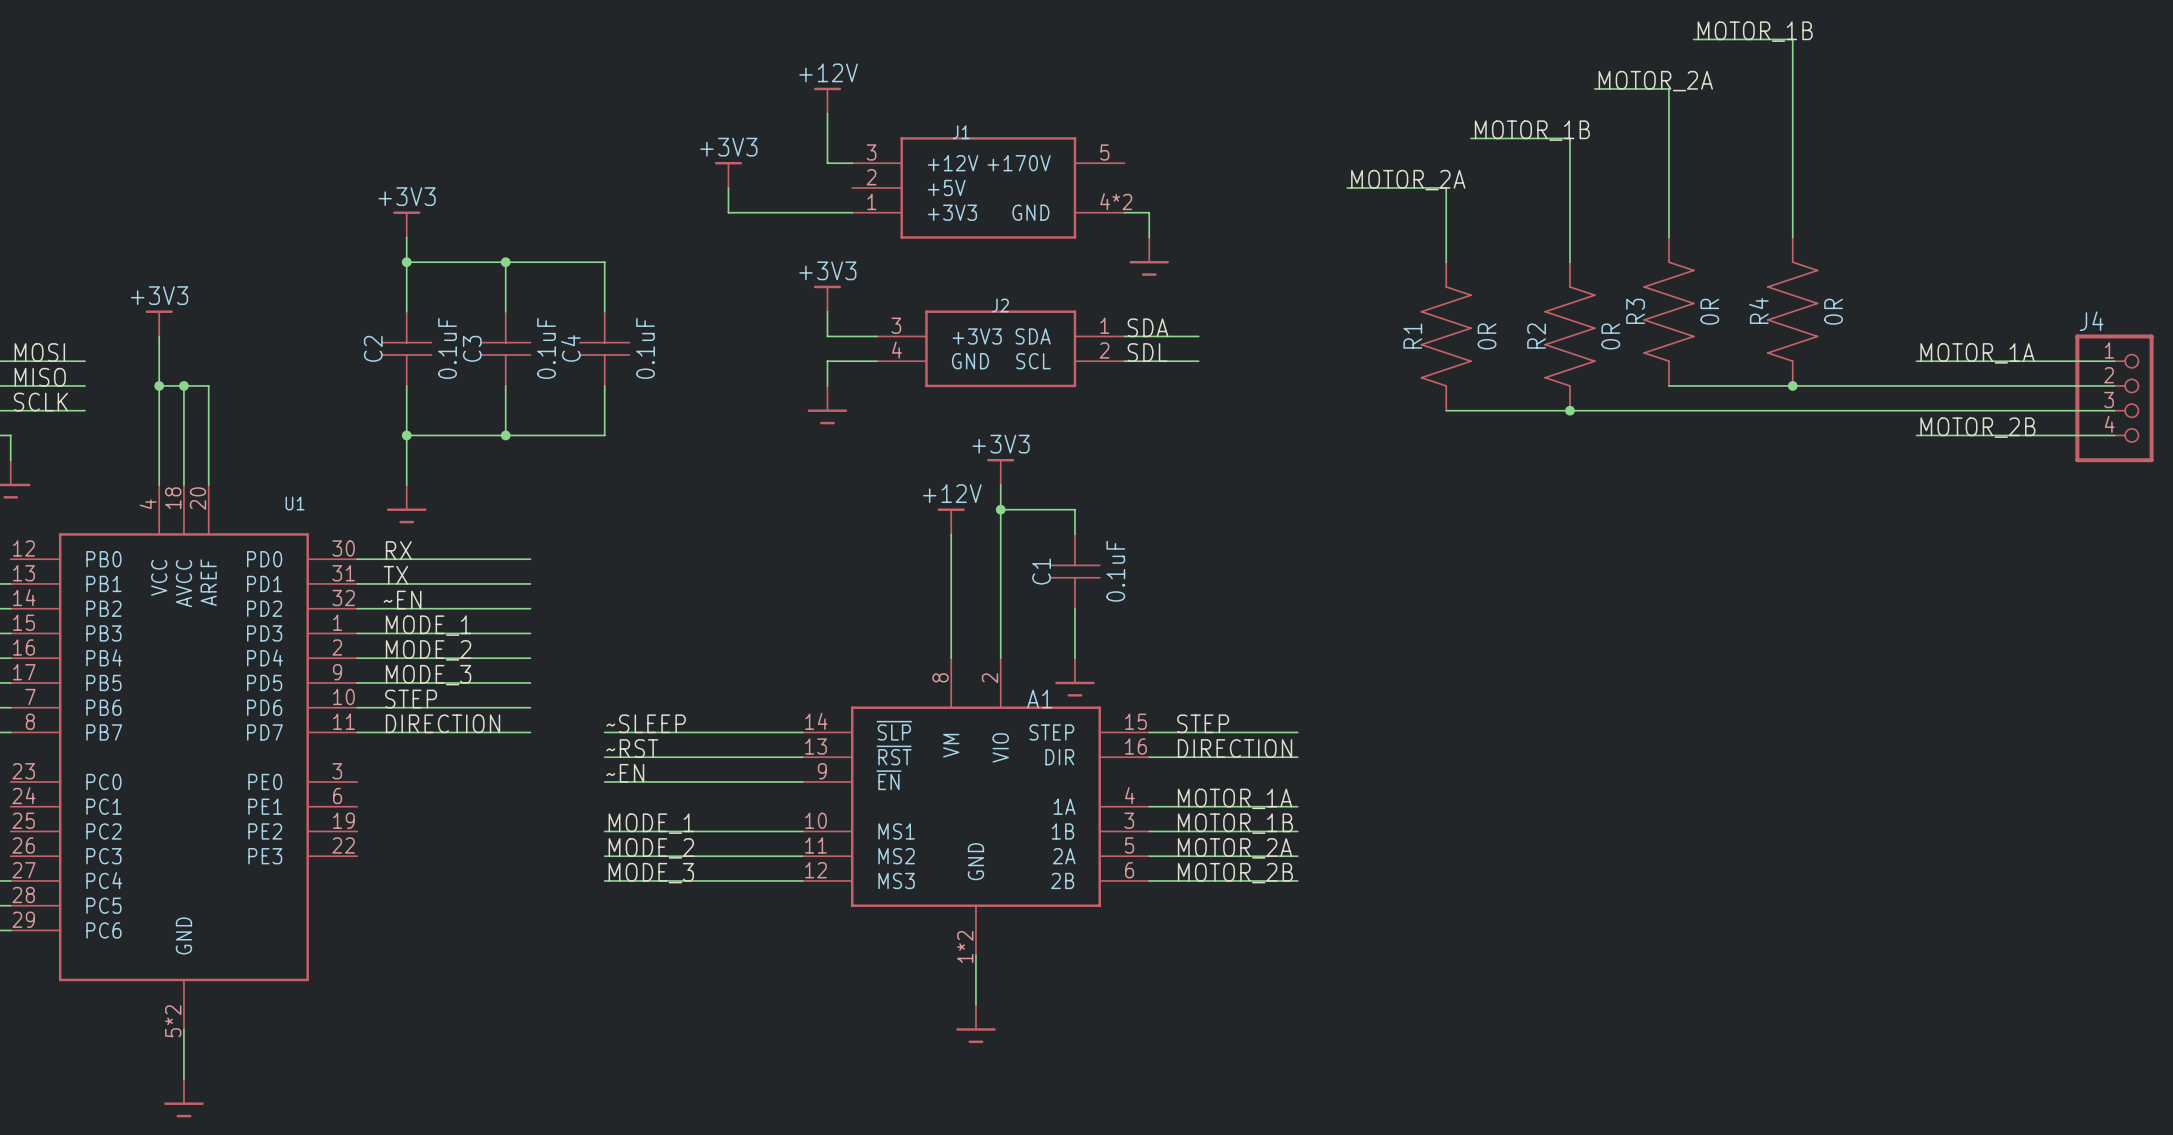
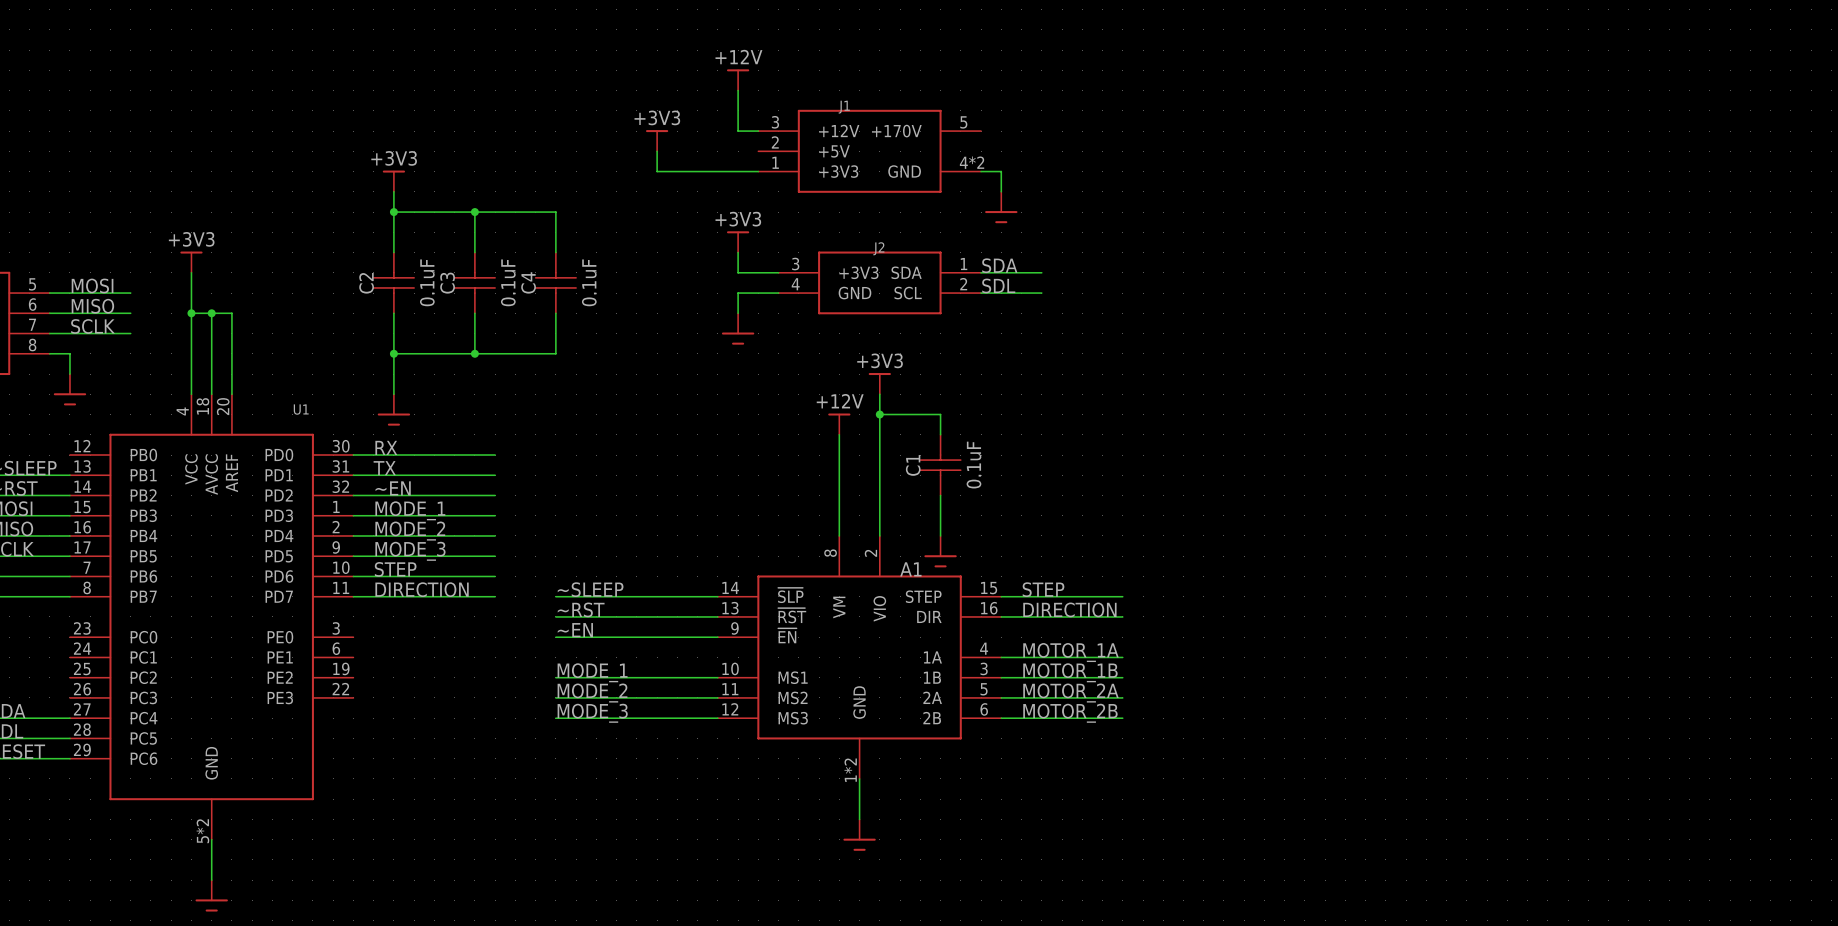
label: MOTOR_1B (1755, 31) -> none
wire: (1693, 39) (1792, 39) (1792, 237) -> none
label: MOTOR_2A (1655, 81) -> none
wire: (1594, 88) (1668, 88) (1668, 237) -> none
label: MOTOR_1B (1532, 130) -> none
wire: (1470, 138) (1569, 138) (1569, 262) -> none
label: MOTOR_2A (1408, 180) -> none
wire: (1347, 187) (1446, 187) (1446, 262) -> none
R3: 0R (1668, 311) -> none
R4: 0R (1792, 311) -> none
R1: 0R (1446, 336) -> none
R2: 0R (1569, 336) -> none
label: MOTOR_1A (1977, 353) -> none
wire: (1916, 361) (2114, 361) -> none
wire: (1668, 385) (2114, 385) -> none
junction: (1792, 385) -> none
J4: (2114, 398) -> none
wire: (1446, 410) (2114, 410) -> none
junction: (1569, 410) -> none
label: MOTOR_2B (1977, 427) -> none
wire: (1916, 435) (2114, 435) -> none

